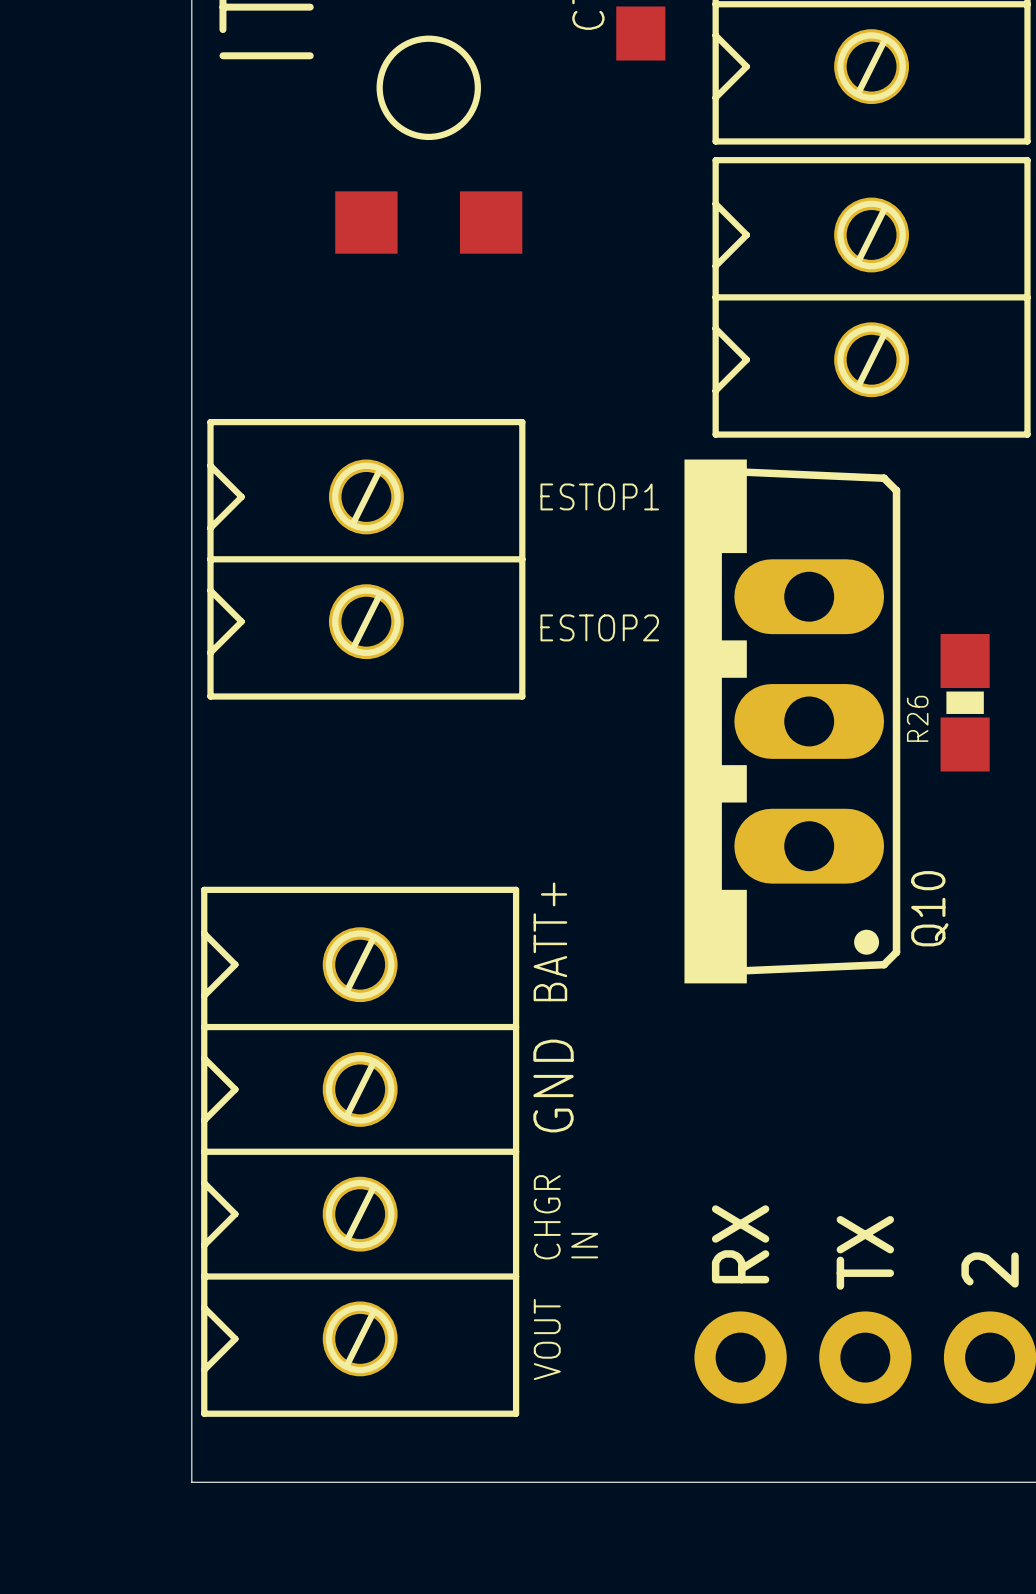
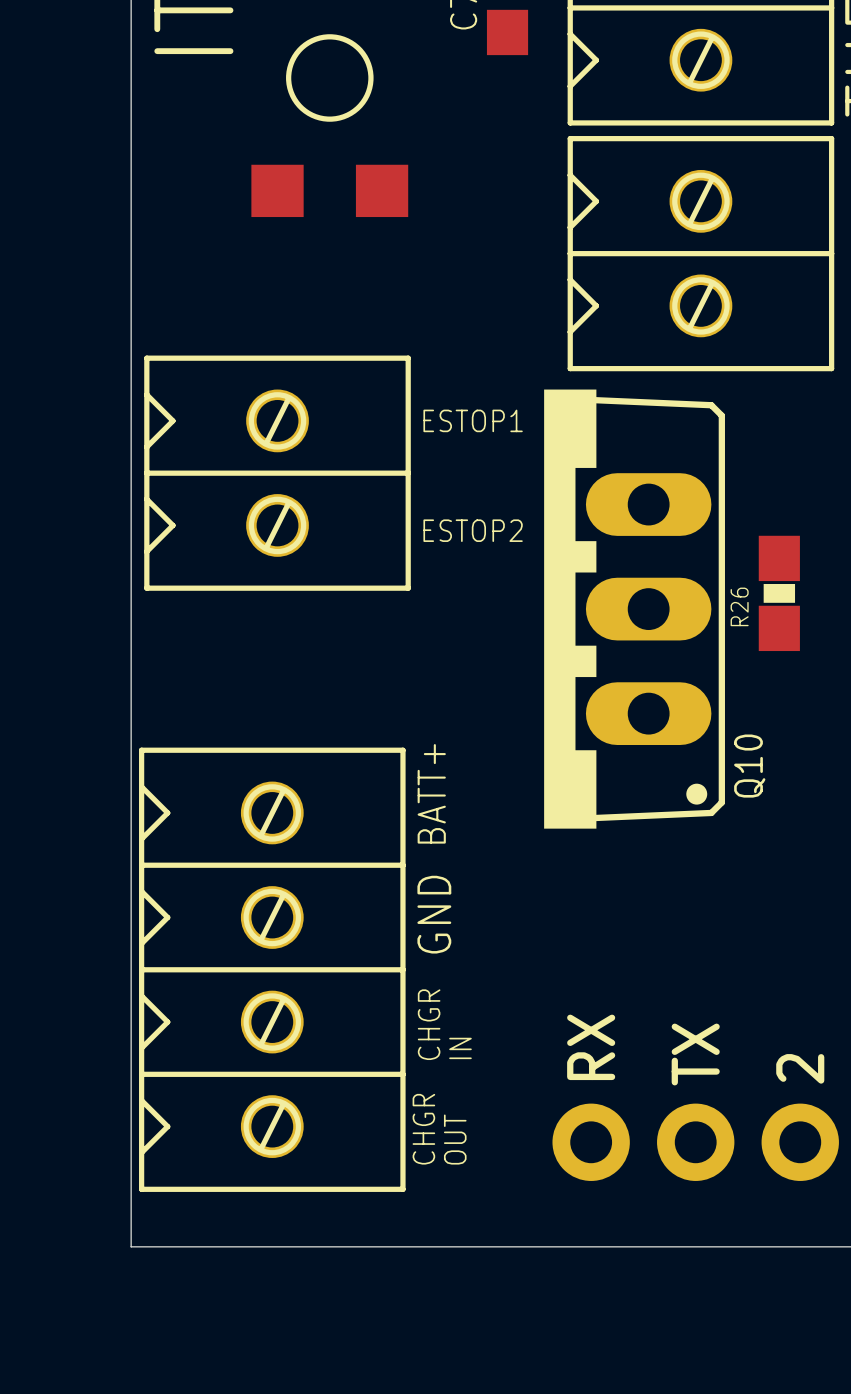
text: VOUT (547, 1339) -> CHGR (423, 1129)
text: none -> OUT (455, 1139)

